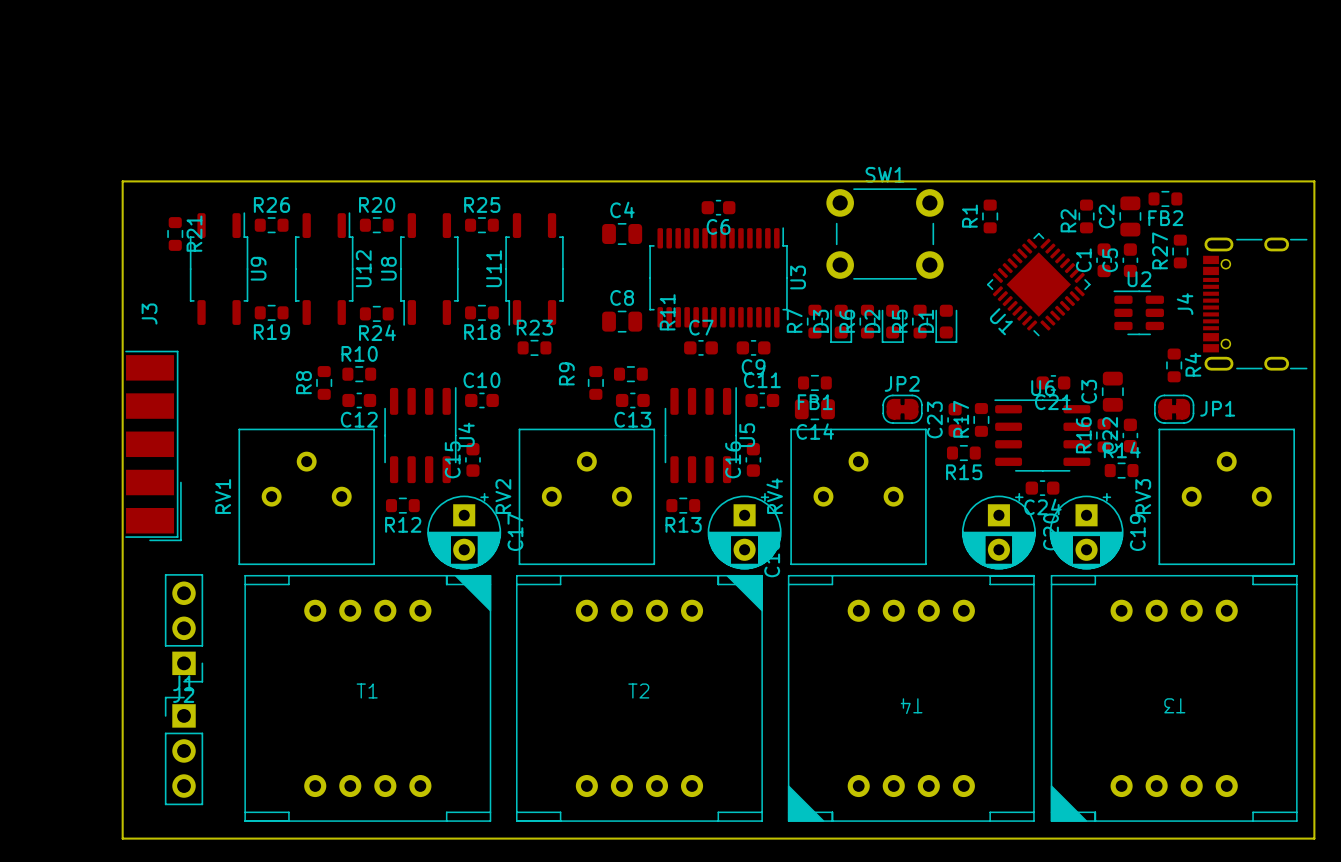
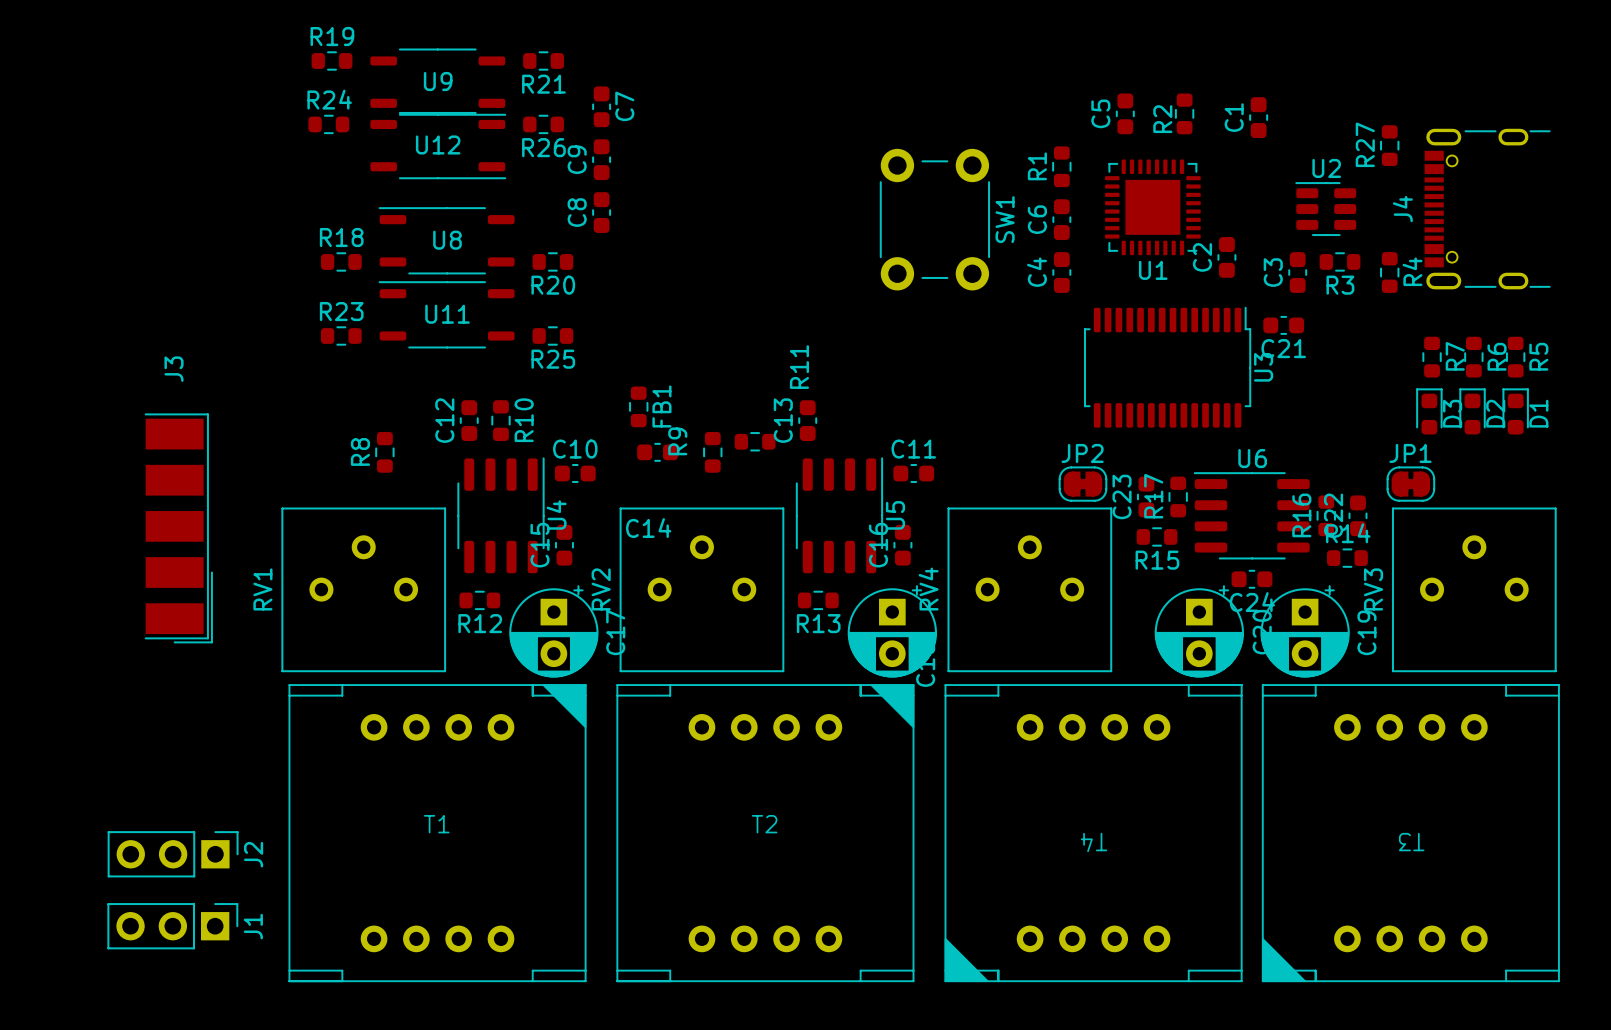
board edge: (122, 181) (1314, 181) (1314, 838) (122, 838) (122, 181) -> none
C2 footprint: [1119, 196, 1142, 237] -> [1217, 237, 1237, 278]
FB2: (1165, 198) -> none
R26 name position: R26 (271, 204) -> R26 (543, 147)
R20 name position: R20 (377, 204) -> R20 (553, 285)
R25 name position: R25 (482, 204) -> R25 (553, 359)
C6 rotation: 0° (718, 207) -> 90° clockwise (1061, 219)
C6 position: (718, 207) -> (1061, 219)
C4 name position: C4 (622, 209) -> C4 (1037, 272)
U9 footprint: [189, 212, 249, 325] -> [370, 48, 507, 116]
U12 footprint: [294, 212, 354, 325] -> [370, 111, 507, 180]
U8 footprint: [400, 213, 459, 326] -> [378, 207, 515, 275]
U11 footprint: [505, 213, 564, 326] -> [378, 281, 515, 349]
R1 position: (990, 216) -> (1061, 166)
R2 position: (1086, 216) -> (1184, 113)
C4 footprint: [602, 223, 643, 245] -> [1052, 252, 1072, 293]
R26 position: (271, 225) -> (543, 124)
R20 position: (376, 225) -> (552, 261)
R25 position: (481, 225) -> (552, 335)
R3: none -> (1340, 261)
R21 rotation: 0° (175, 233) -> 90° clockwise (543, 60)
R21 position: (175, 233) -> (543, 60)
SW1 rotation: 0° (885, 233) -> 90° clockwise (934, 219)
SW1 position: (885, 233) -> (934, 219)
R27 position: (1180, 251) -> (1389, 145)
C1 position: (1104, 260) -> (1258, 117)
C5 position: (1130, 260) -> (1125, 113)
U9 name position: U9 (258, 268) -> U9 (438, 81)
U12 name position: U12 (363, 268) -> U12 (438, 144)
U8 name position: U8 (388, 268) -> U8 (447, 240)
U11 name position: U11 (493, 268) -> U11 (447, 314)
U3 position: (718, 277) -> (1167, 367)
U1 rotation: 0° (1038, 284) -> 45° counterclockwise (1152, 207)
U1 position: (1038, 284) -> (1152, 207)
C8 name position: C8 (622, 297) -> C8 (577, 212)
J4 position: (1255, 304) -> (1487, 209)
C8 footprint: [602, 310, 643, 333] -> [592, 192, 612, 233]
R19 position: (271, 312) -> (332, 60)
R18 position: (481, 312) -> (341, 261)
U2 position: (1138, 312) -> (1325, 209)
R24 position: (376, 313) -> (328, 124)
R7 name position: R7 (794, 320) -> R7 (1455, 356)
R7 position: (814, 321) -> (1432, 357)
R6 name position: R6 (847, 321) -> R6 (1497, 356)
R6 position: (867, 321) -> (1473, 357)
R5 name position: R5 (899, 321) -> R5 (1538, 356)
R5 position: (920, 321) -> (1515, 357)
D3 rotation: 0° (841, 323) -> 180° (1429, 411)
D3 position: (841, 323) -> (1429, 411)
D2 rotation: 0° (892, 323) -> 180° (1472, 411)
D2 position: (892, 323) -> (1472, 411)
D1 rotation: 0° (946, 323) -> 180° (1515, 411)
D1 position: (946, 323) -> (1515, 411)
R19 name position: R19 (271, 332) -> R19 (332, 36)
R24 name position: R24 (377, 332) -> R24 (329, 99)
R18 name position: R18 (482, 332) -> R18 (341, 237)
R23 position: (534, 347) -> (341, 335)
C7 rotation: 0° (701, 347) -> 90° clockwise (601, 106)
C7 position: (701, 347) -> (601, 106)
C9 rotation: 0° (753, 347) -> 90° clockwise (601, 159)
C9 position: (753, 347) -> (601, 159)
R4 position: (1174, 365) -> (1389, 272)
C3 footprint: [1101, 371, 1124, 412] -> [1288, 252, 1308, 293]
R10 rotation: 0° (359, 374) -> 90° clockwise (500, 420)
R10 position: (359, 374) -> (500, 420)
FB1 rotation: 0° (814, 382) -> 90° clockwise (638, 406)
FB1 position: (814, 382) -> (638, 406)
C21 position: (1053, 382) -> (1283, 325)
C14 footprint: [794, 398, 835, 421] -> [637, 442, 678, 462]
C12 rotation: 0° (359, 400) -> 90° clockwise (469, 420)
C12 position: (359, 400) -> (469, 420)
C13 rotation: 0° (632, 400) -> 90° clockwise (807, 420)
C13 position: (632, 400) -> (807, 420)
FB1 name position: FB1 (815, 402) -> FB1 (661, 406)
JP1 name position: JP1 (1217, 408) -> JP1 (1410, 453)
C14 name position: C14 (815, 431) -> C14 (648, 528)
J2 rotation: 0° (184, 628) -> 90° counterclockwise (173, 854)
J2 position: (184, 628) -> (173, 854)
J1 rotation: 0° (184, 750) -> 90° clockwise (172, 926)

